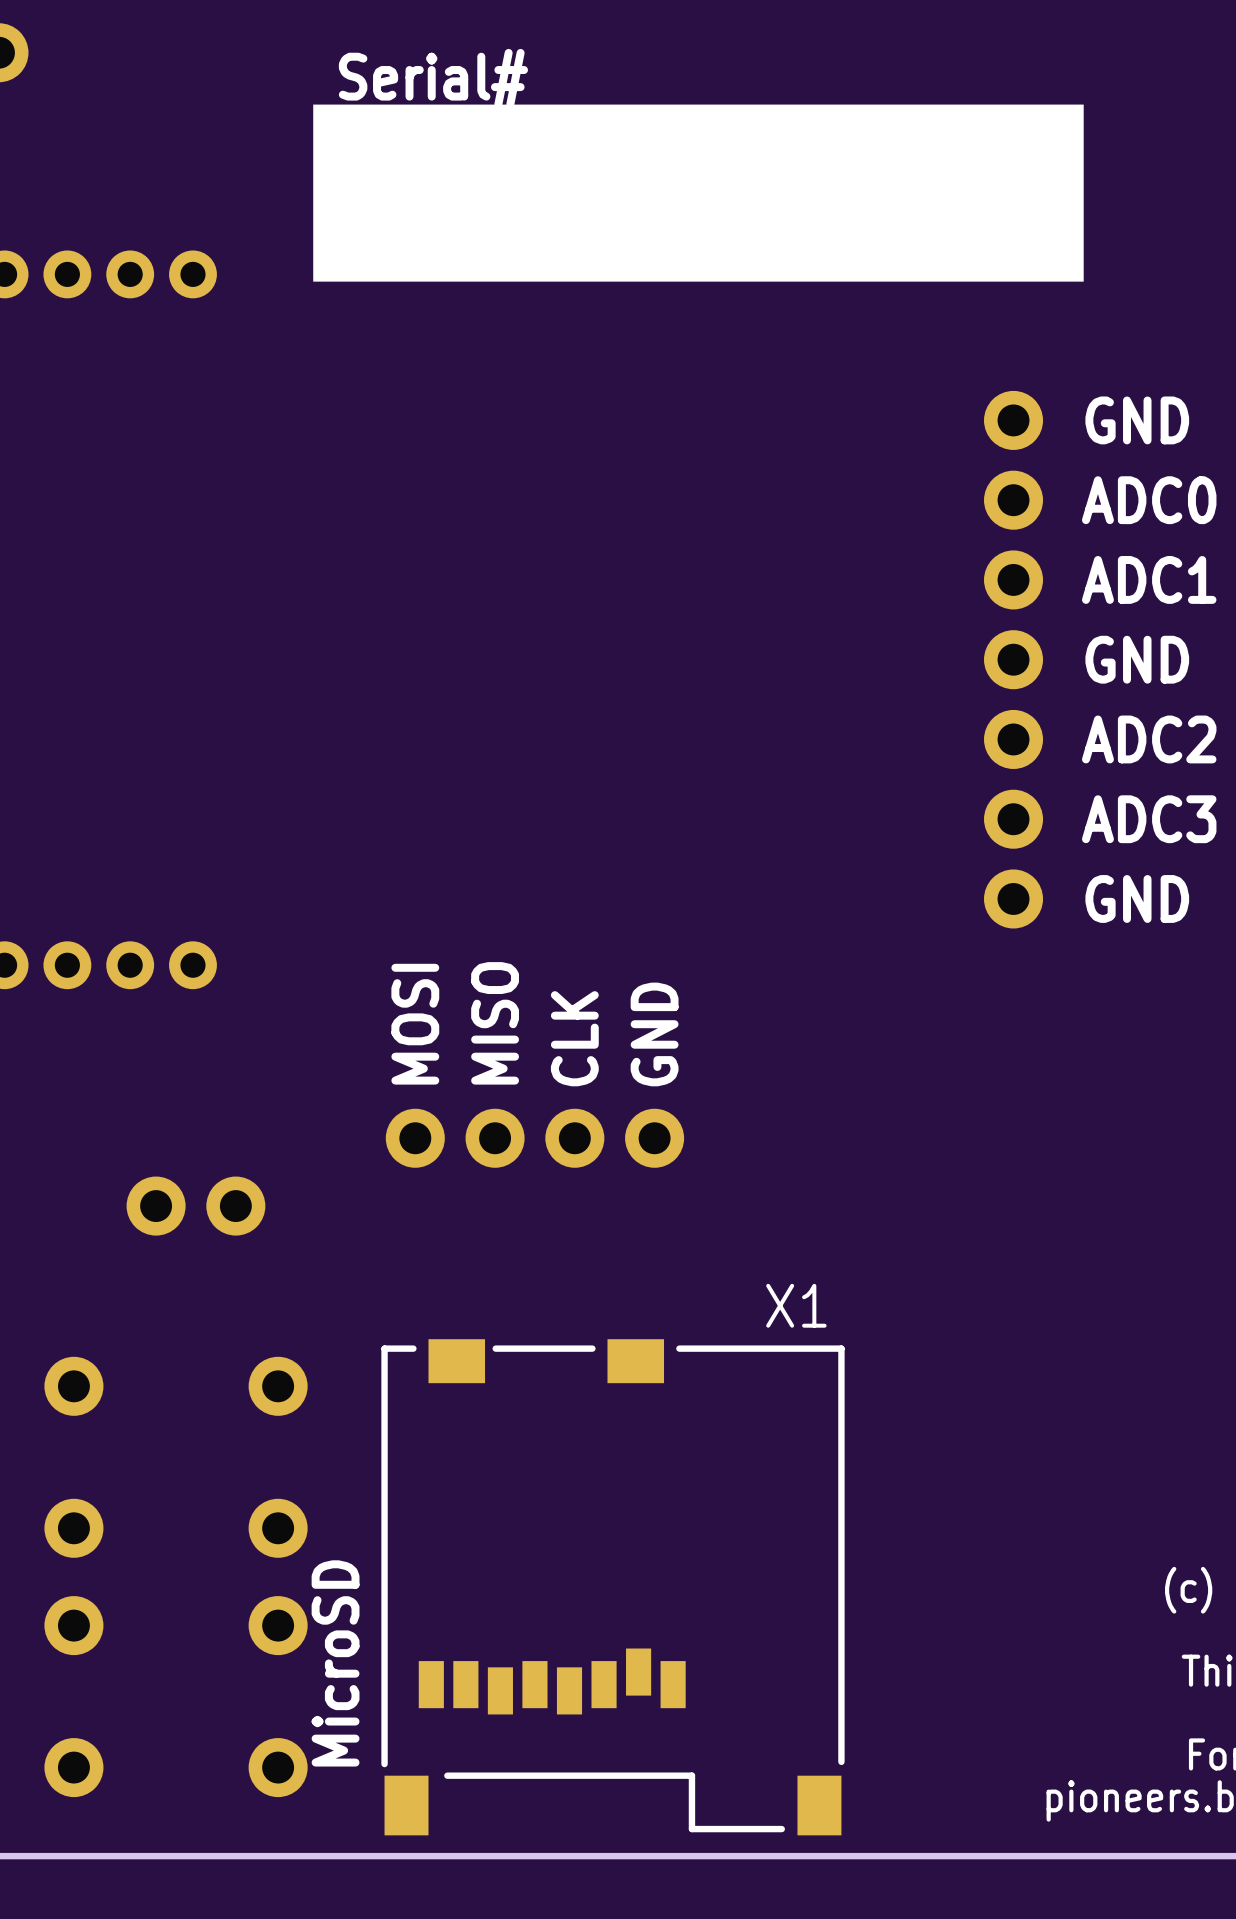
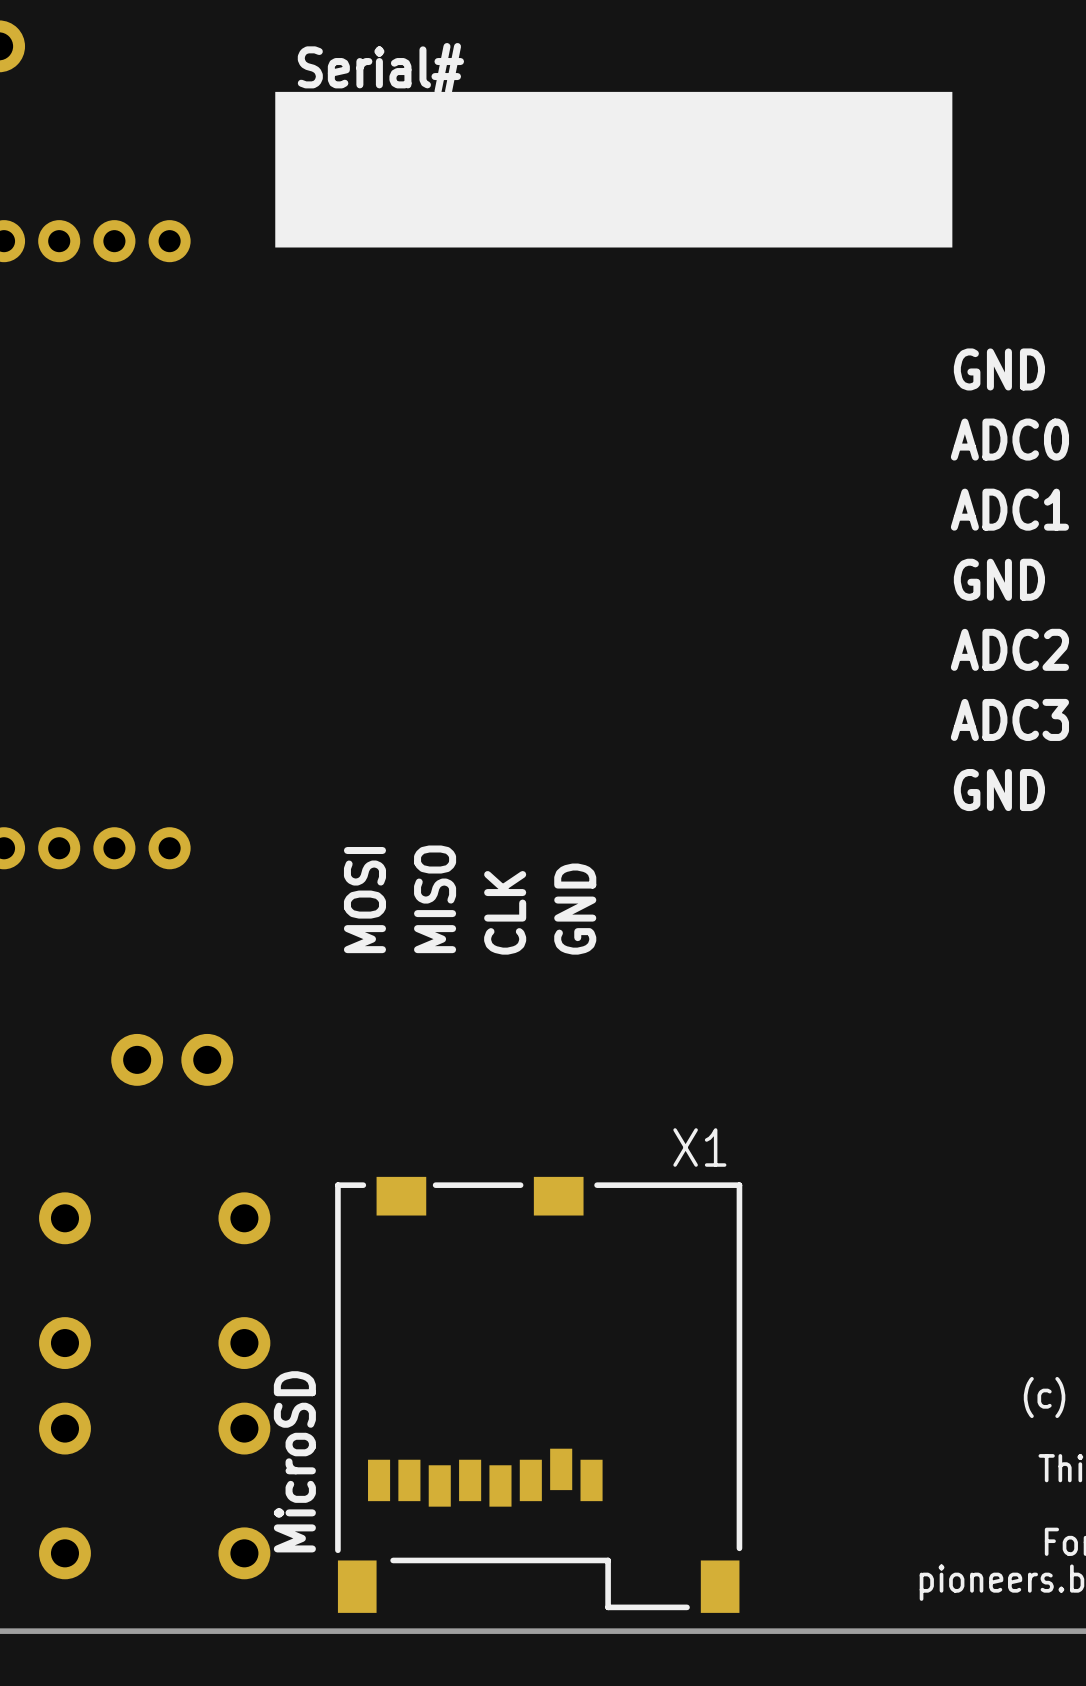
part: (1013, 659) -> none
part: (534, 1138) -> none

